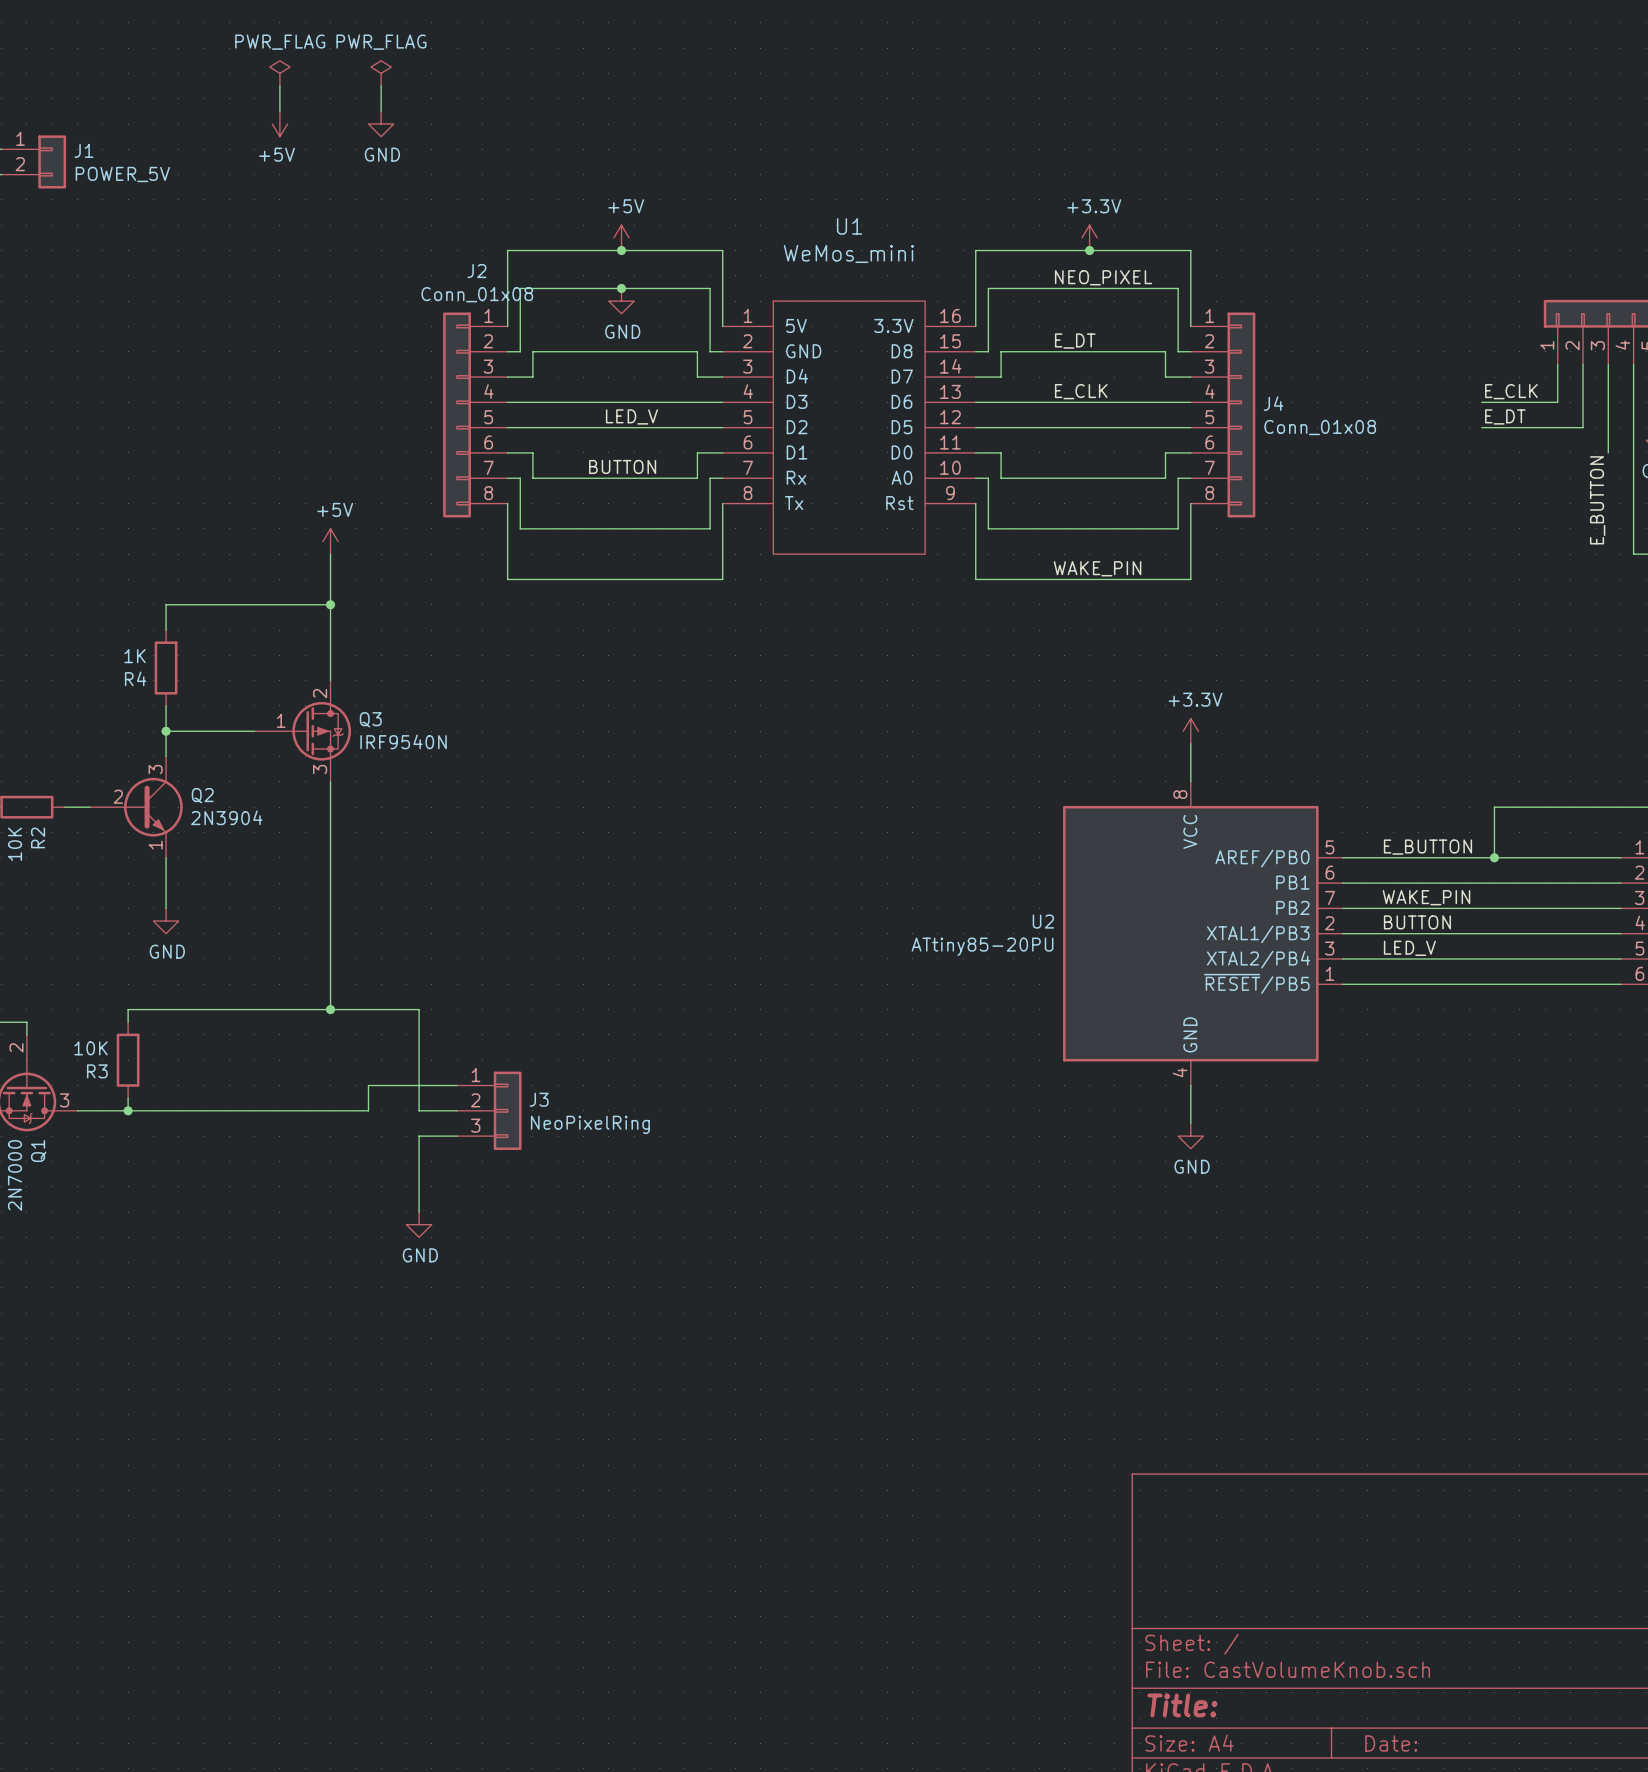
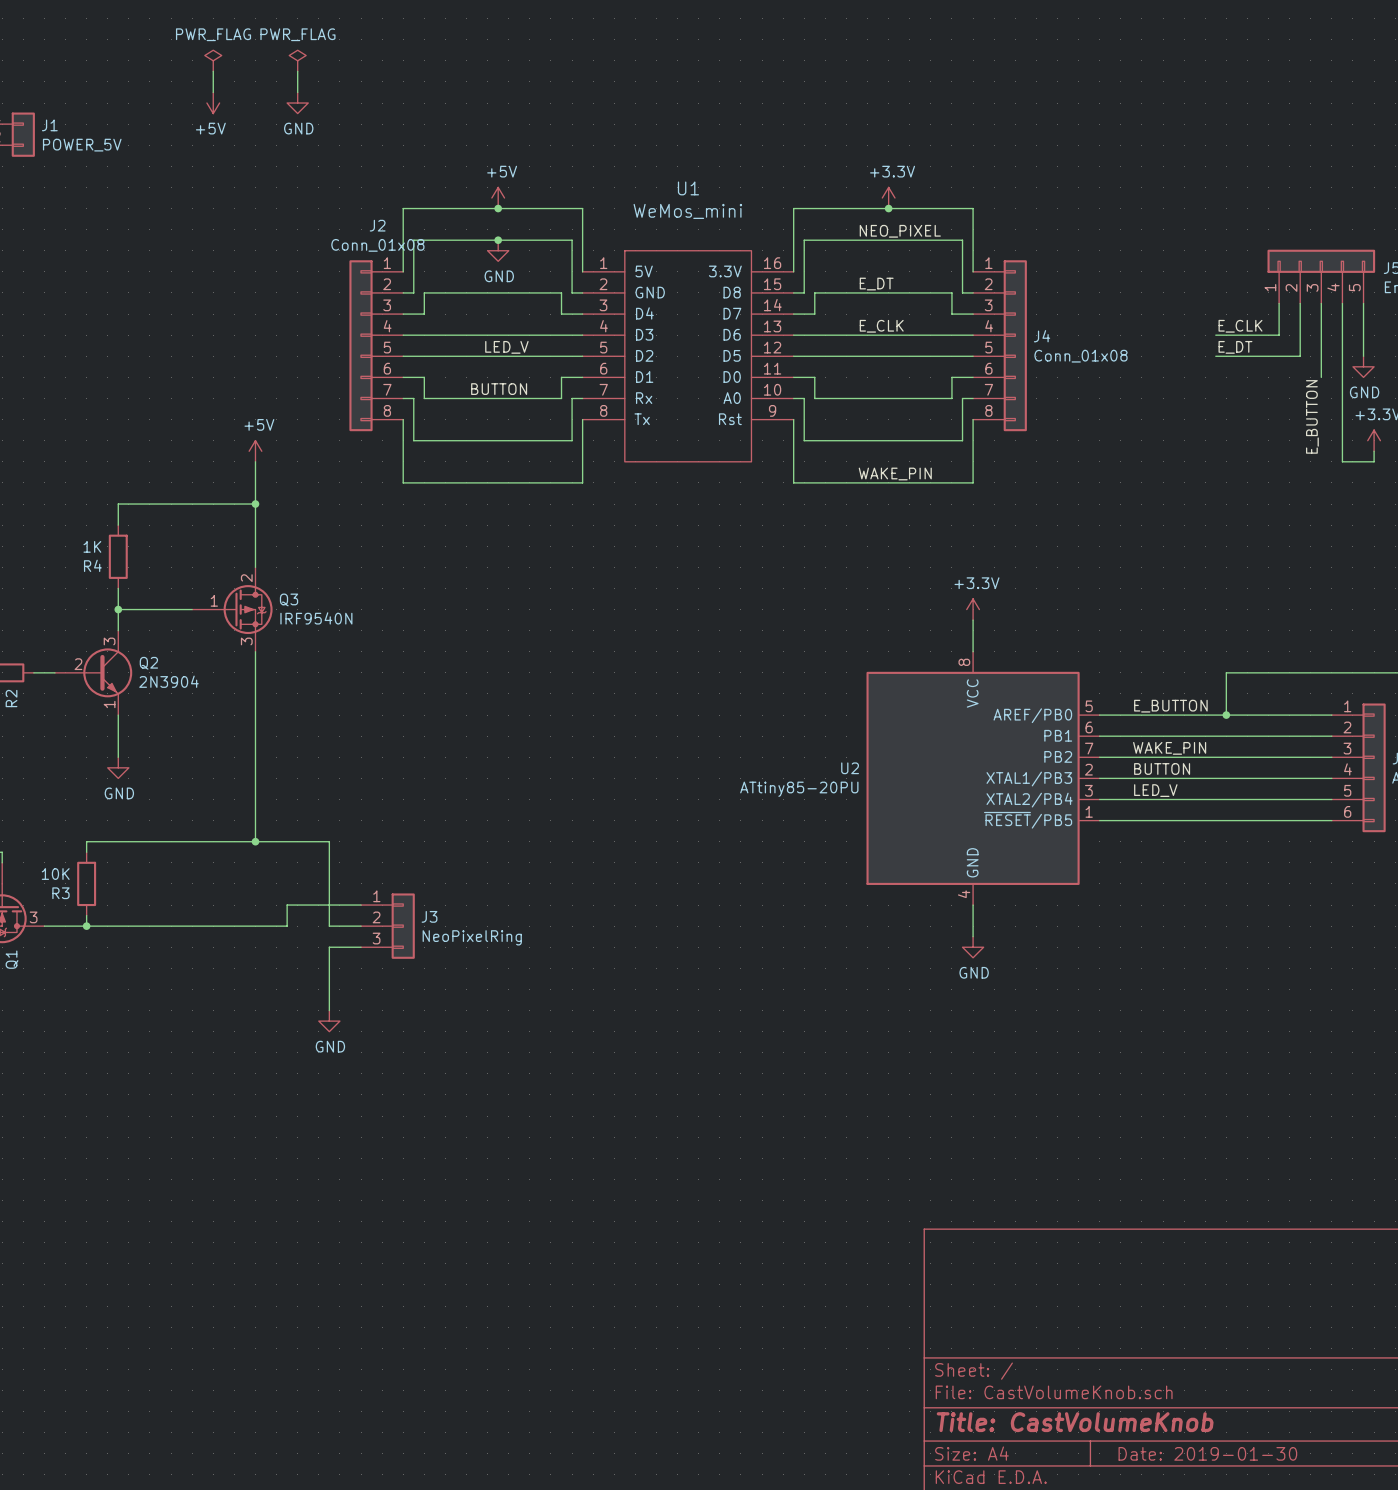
title block: Title: (1182, 1705) -> Title: CastVolumeKnob (1075, 1422)
title block: Date: (1391, 1743) -> Date: 2019-01-30 (1207, 1453)

